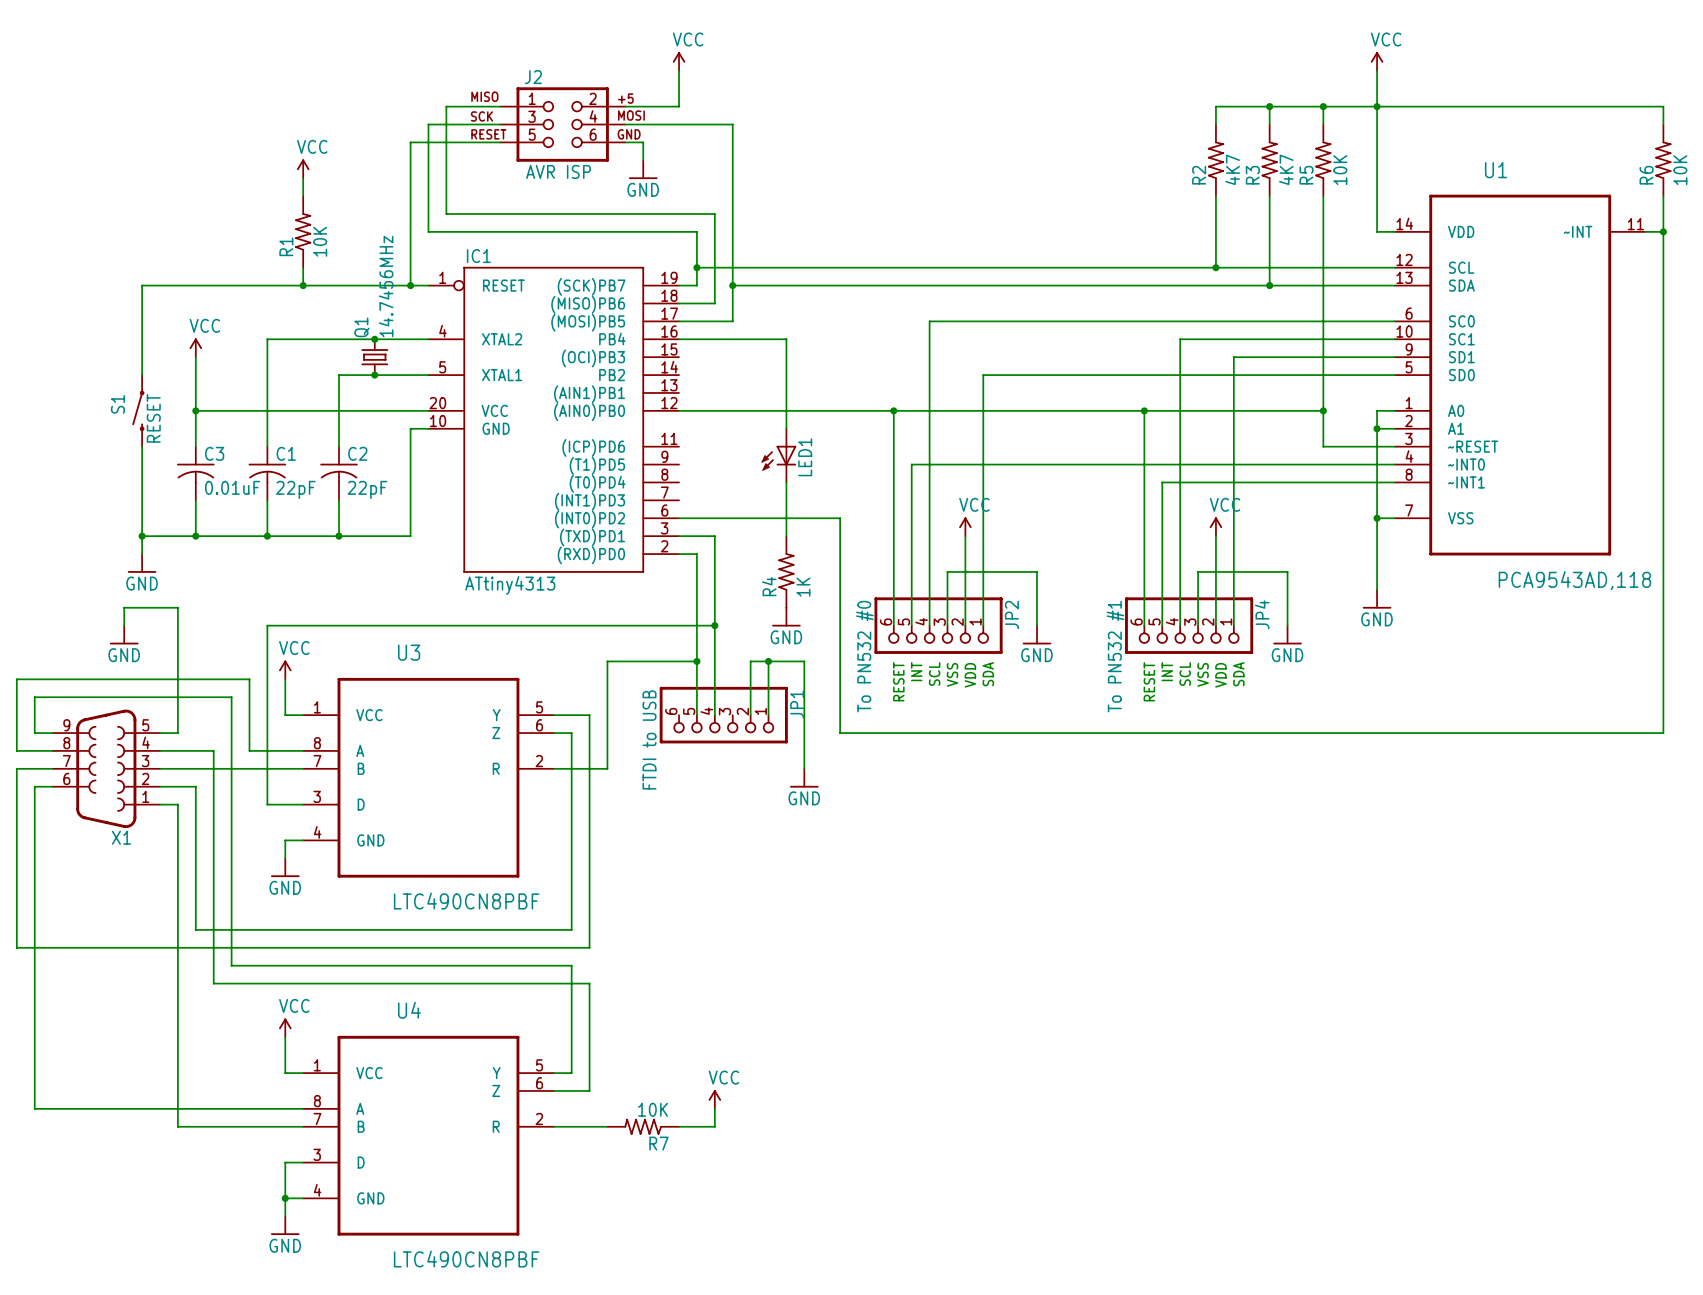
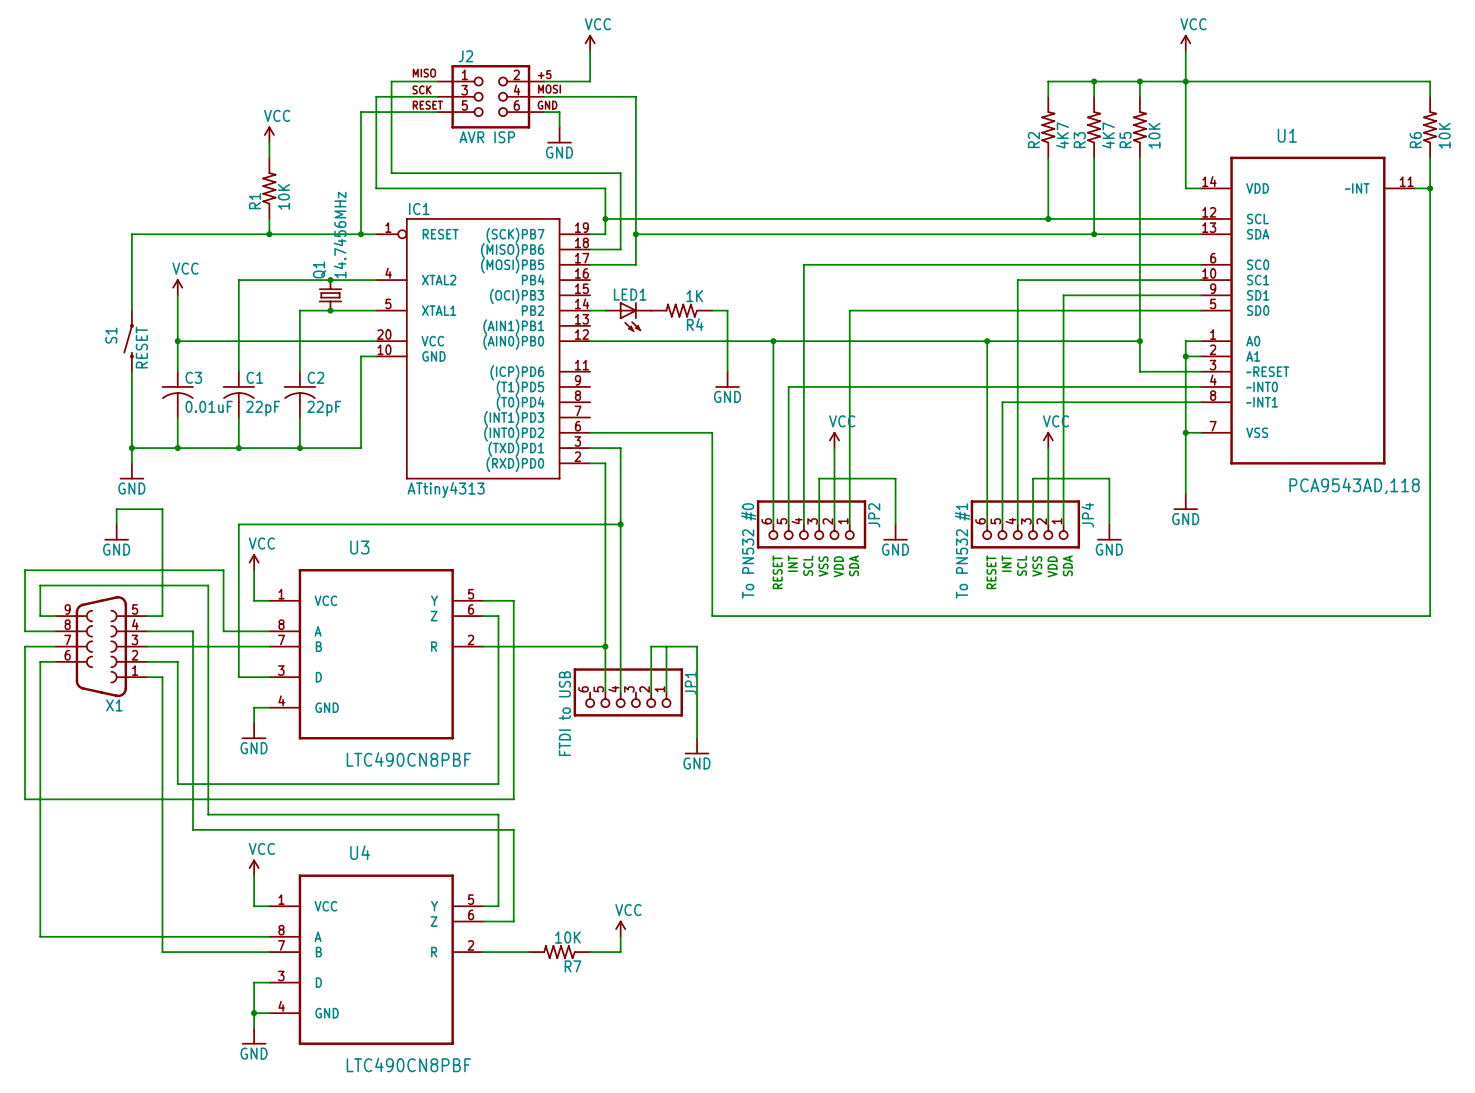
wire: (679, 339) (786, 339) (786, 428) -> none
wire: none -> (590, 310) (605, 310)
wire: none -> (712, 310) (727, 310) (727, 371)
LED1 position: (778, 455) -> (628, 316)
power symbol: none -> GND (727, 379)
LED1 rotation: 0° (778, 458) -> 90° counterclockwise (630, 316)
wire: (786, 482) (786, 536) -> none
wire: (822, 518) (840, 518) (840, 733) -> (712, 432) (712, 616) (727, 616)
R4 rotation: 0° (786, 571) -> 90° counterclockwise (681, 310)
R4 position: (786, 571) -> (681, 310)
power symbol: GND (786, 617) -> none
wire: (696, 661) (607, 661) (607, 768) -> (605, 646) (529, 646)
junction: (696, 661) -> none
wire: (768, 661) (768, 715) -> (666, 646) (666, 692)
junction: (768, 661) -> none
wire: none -> (605, 600) (605, 692)
wire: none -> (620, 600) (620, 692)
JP1 position: (723, 715) -> (628, 692)
wire: (750, 715) (750, 661) (804, 661) (804, 768) -> (651, 692) (651, 646) (697, 646) (697, 738)
junction: none -> (605, 646)
power symbol position: GND (804, 778) -> GND (697, 746)

